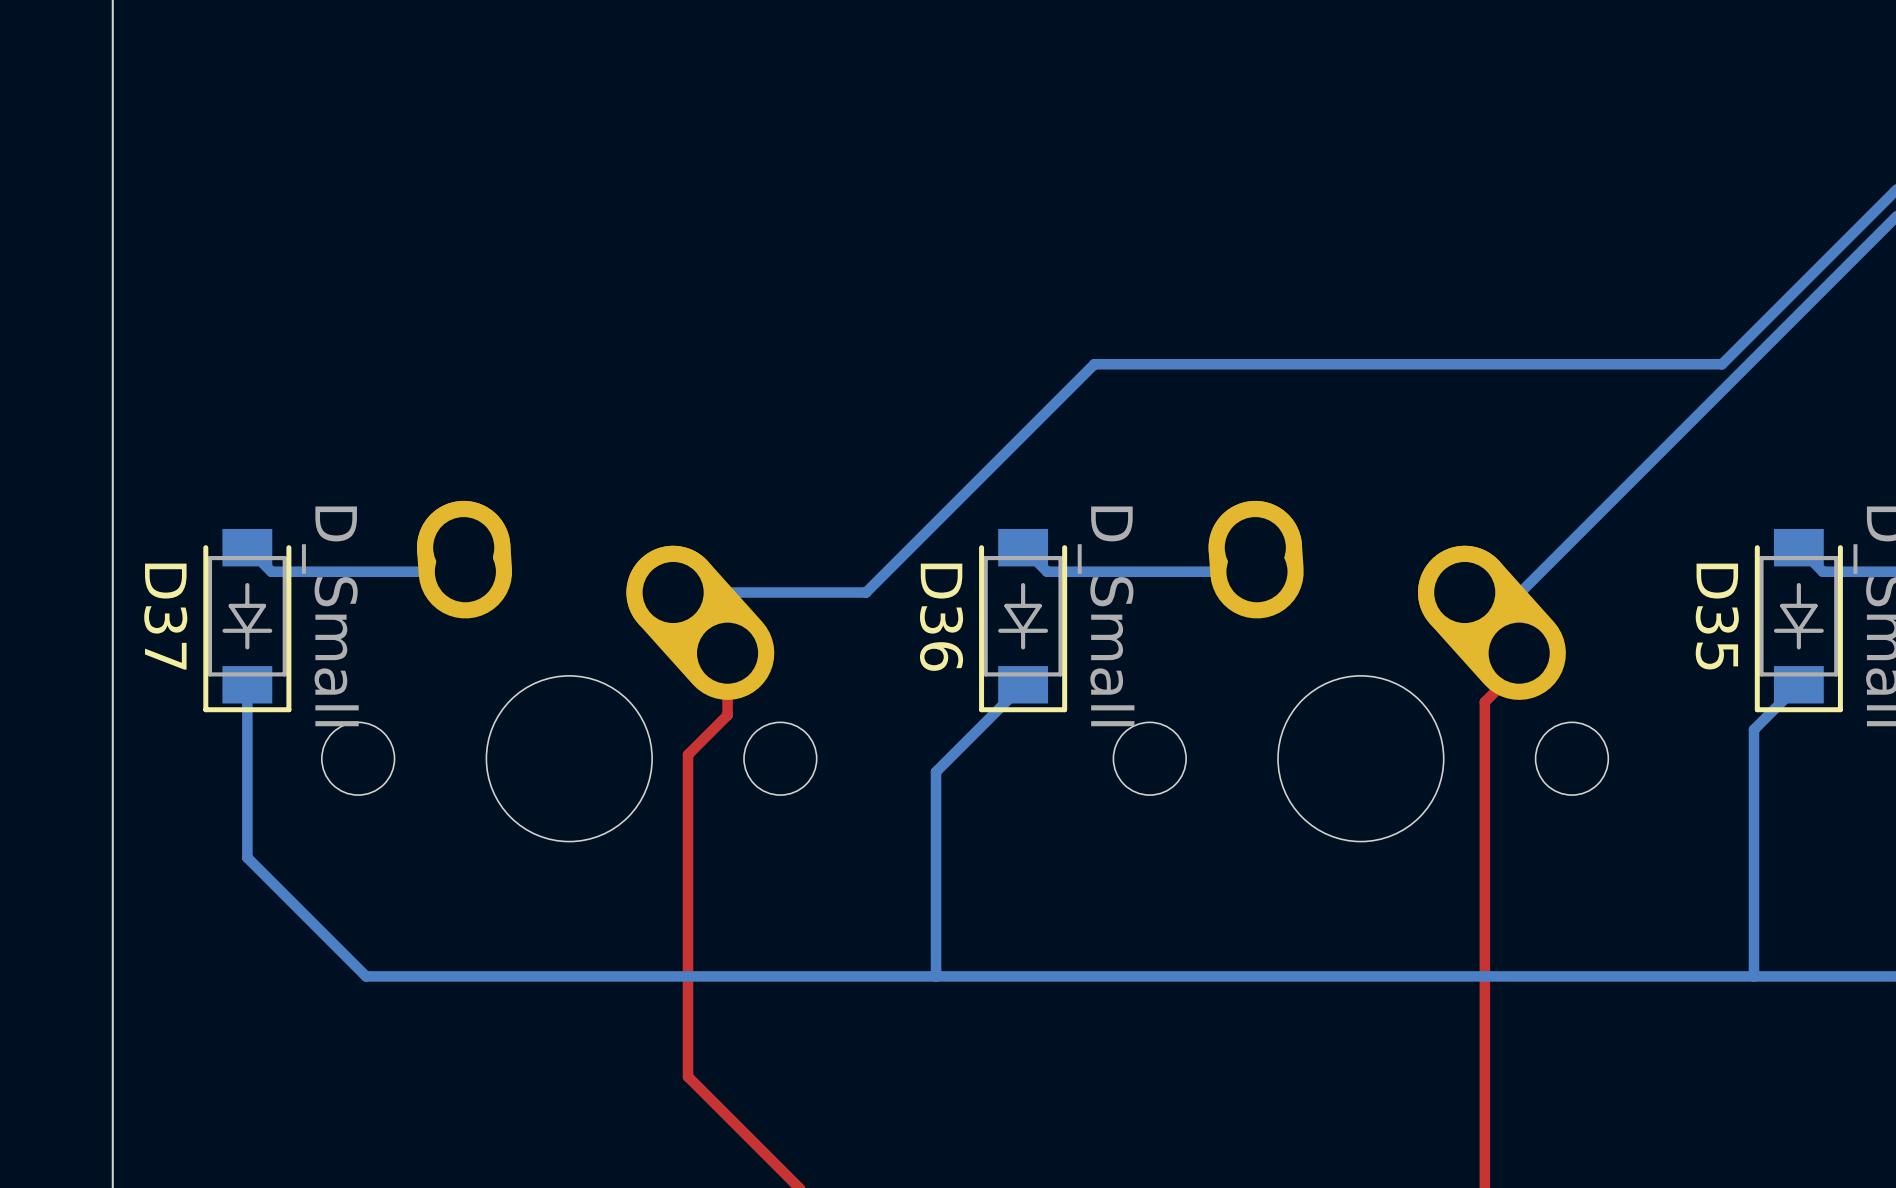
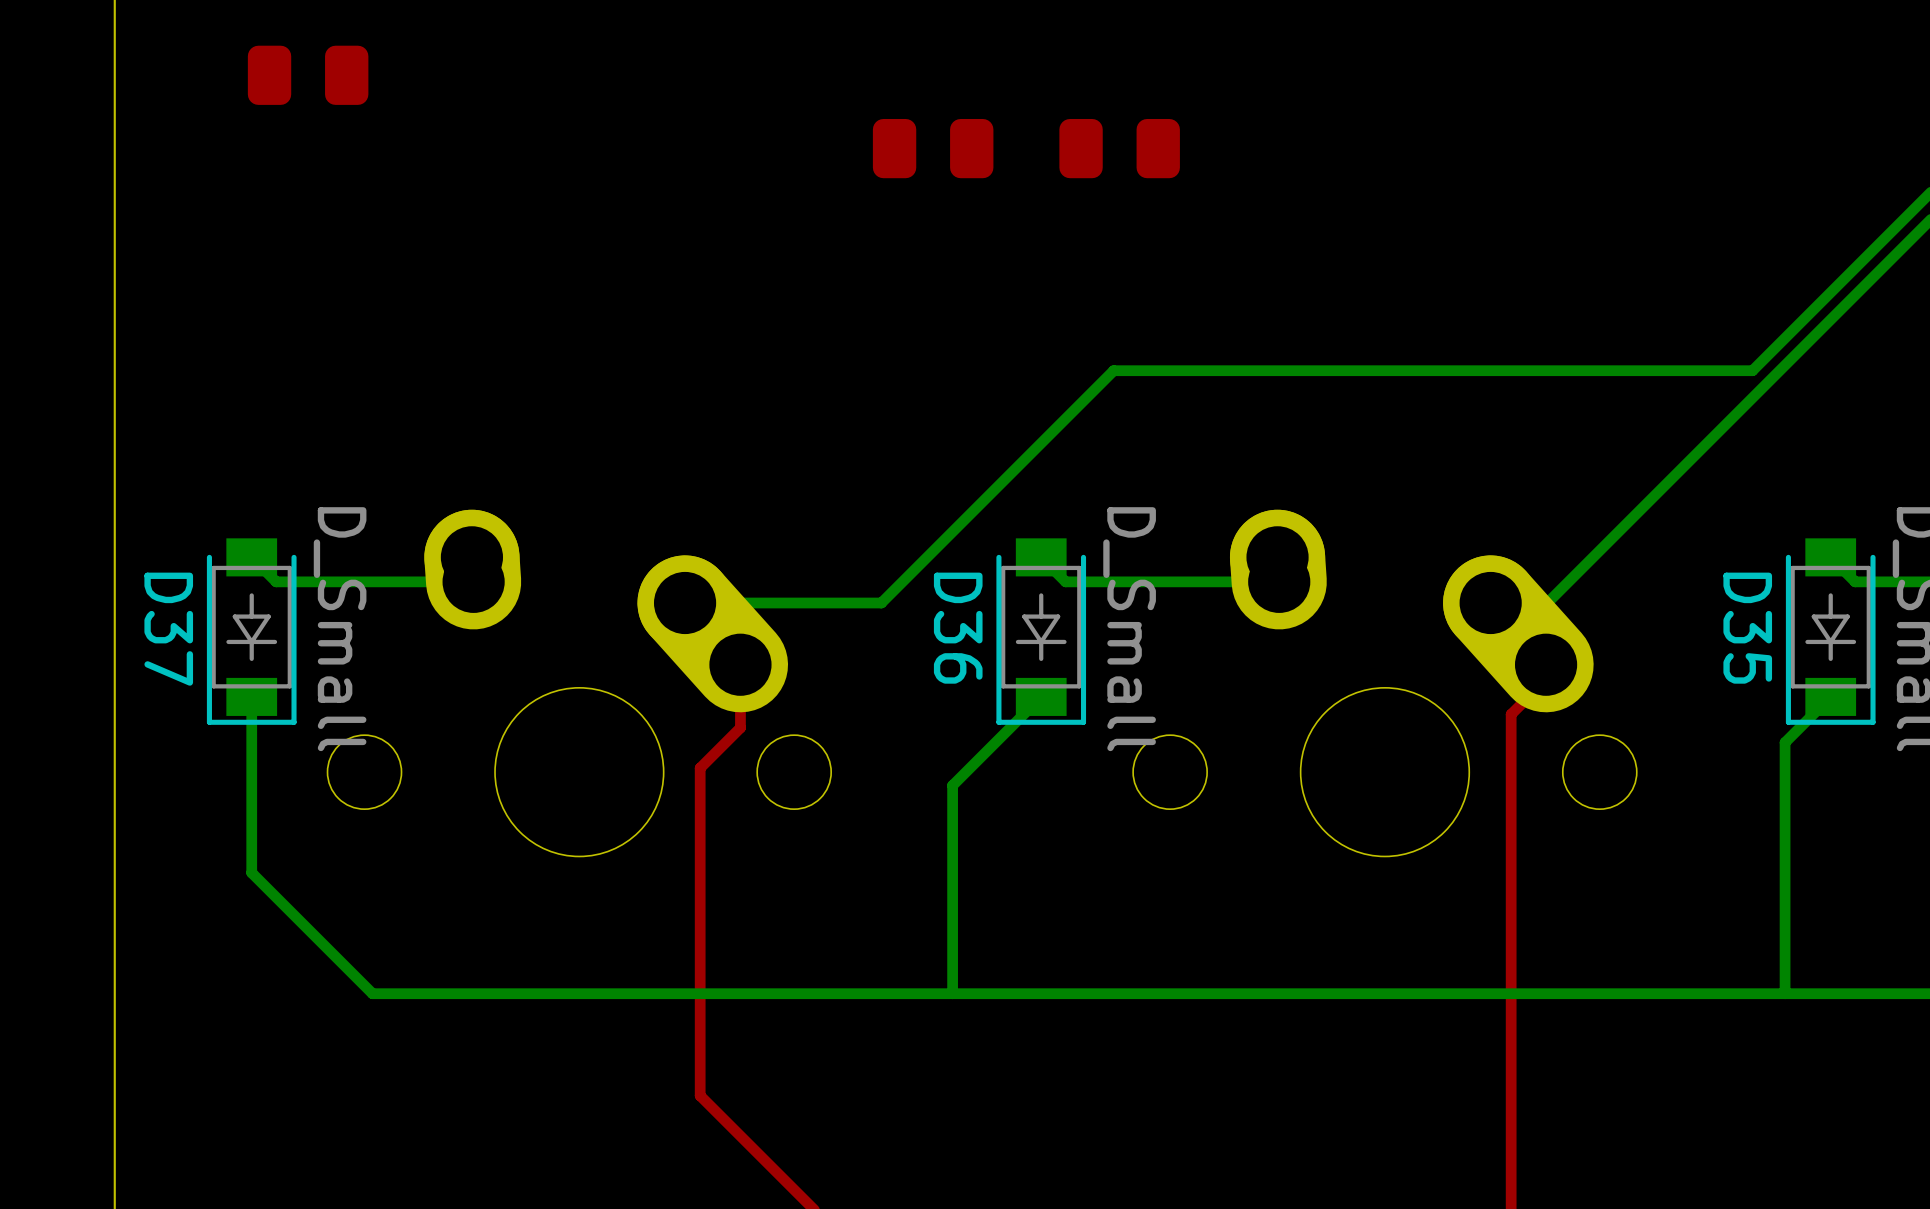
part: none -> (308, 75)
part: none -> (933, 148)
part: none -> (1119, 148)

